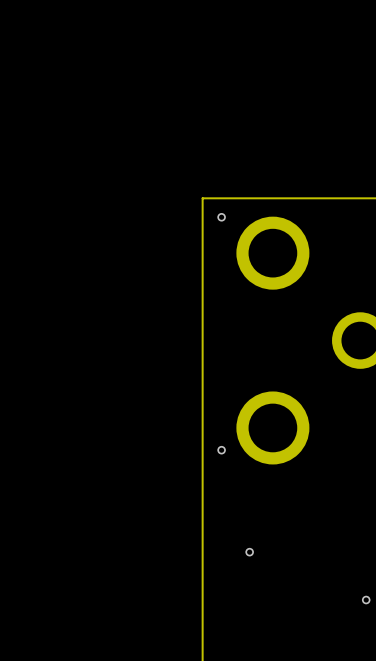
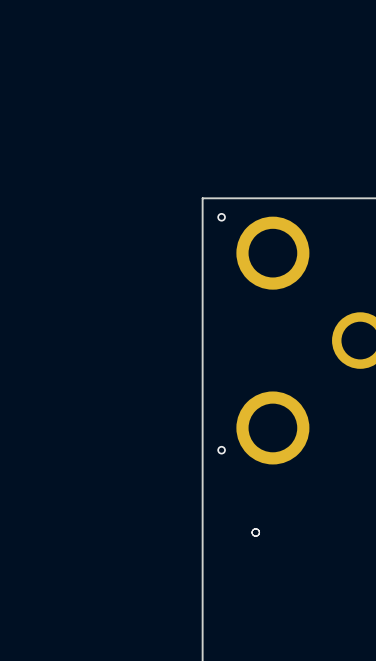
via: none -> (255, 532)
via: (249, 552) -> none
via: (366, 600) -> none

